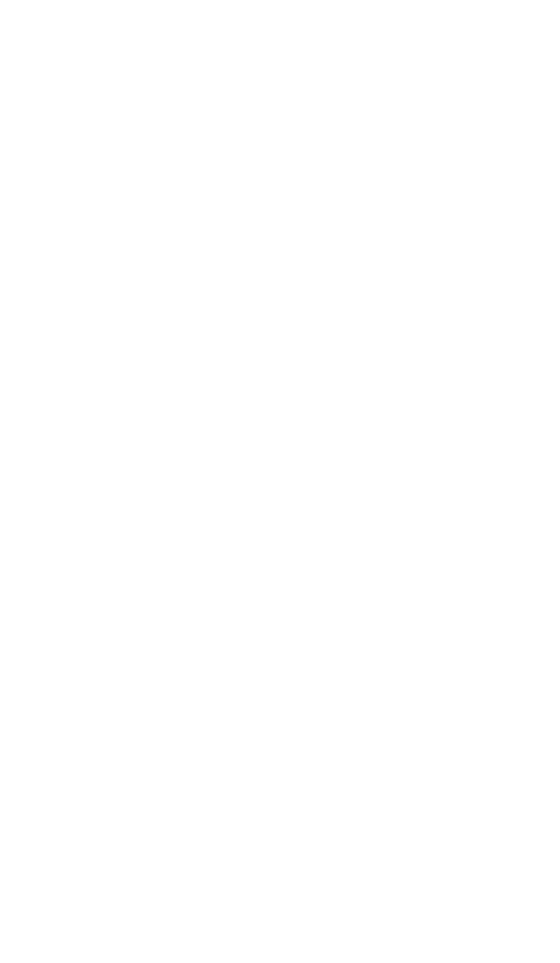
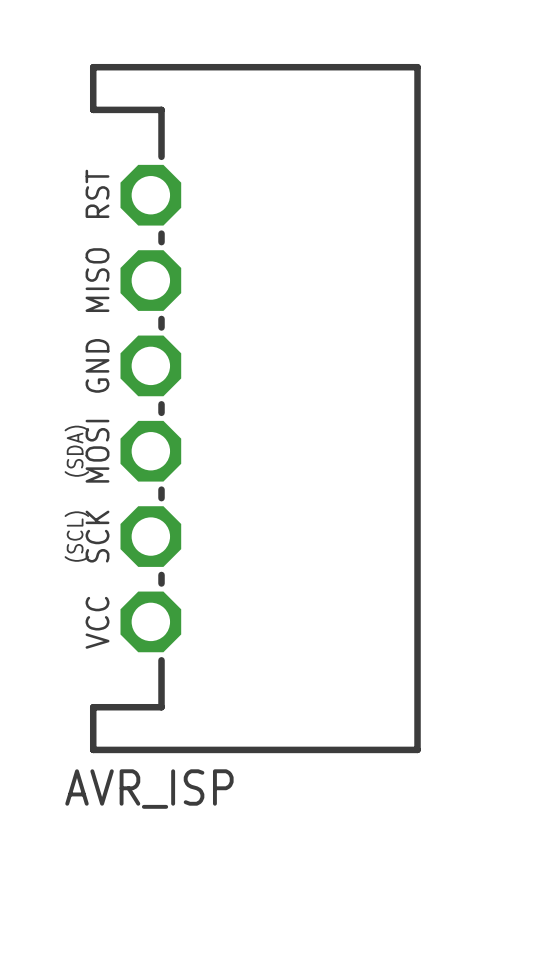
AVR_ISP: none -> (255, 408)

